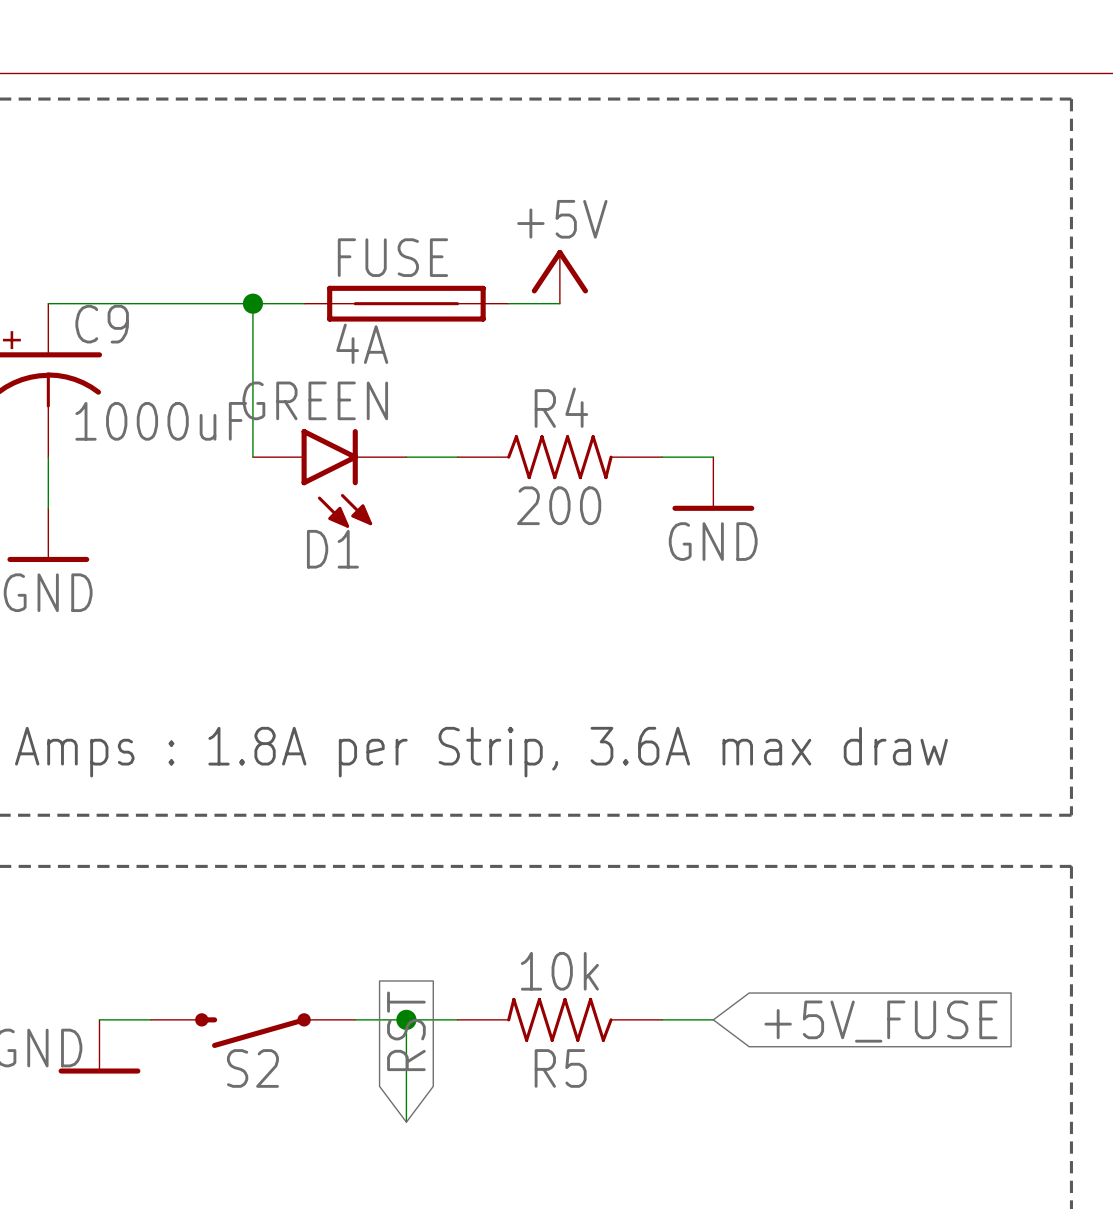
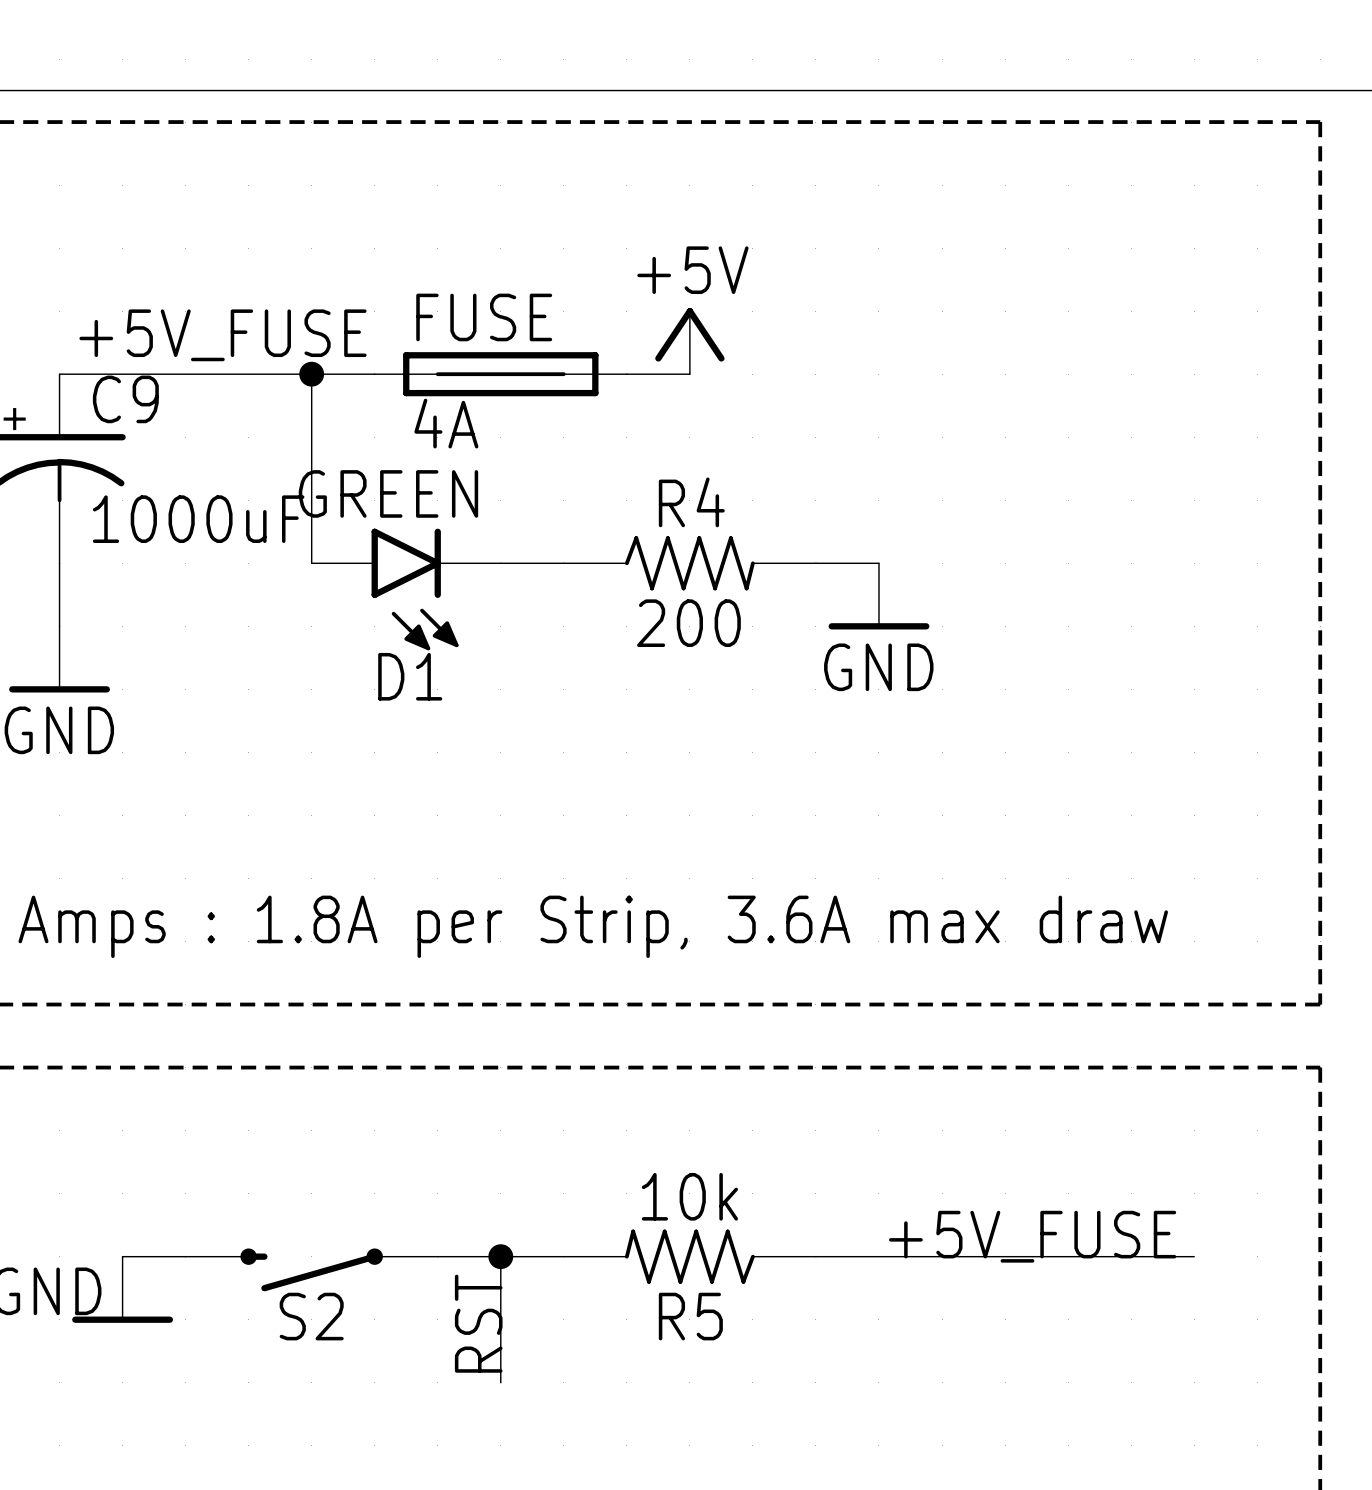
label: none -> +5V_FUSE (223, 335)
label: none -> +5V_FUSE (1032, 1236)
wire: none -> (878, 1256) (1194, 1256)
global label: +5V_FUSE (880, 1021) -> none
global label: RST (406, 1031) -> none
label: none -> RST (478, 1323)

